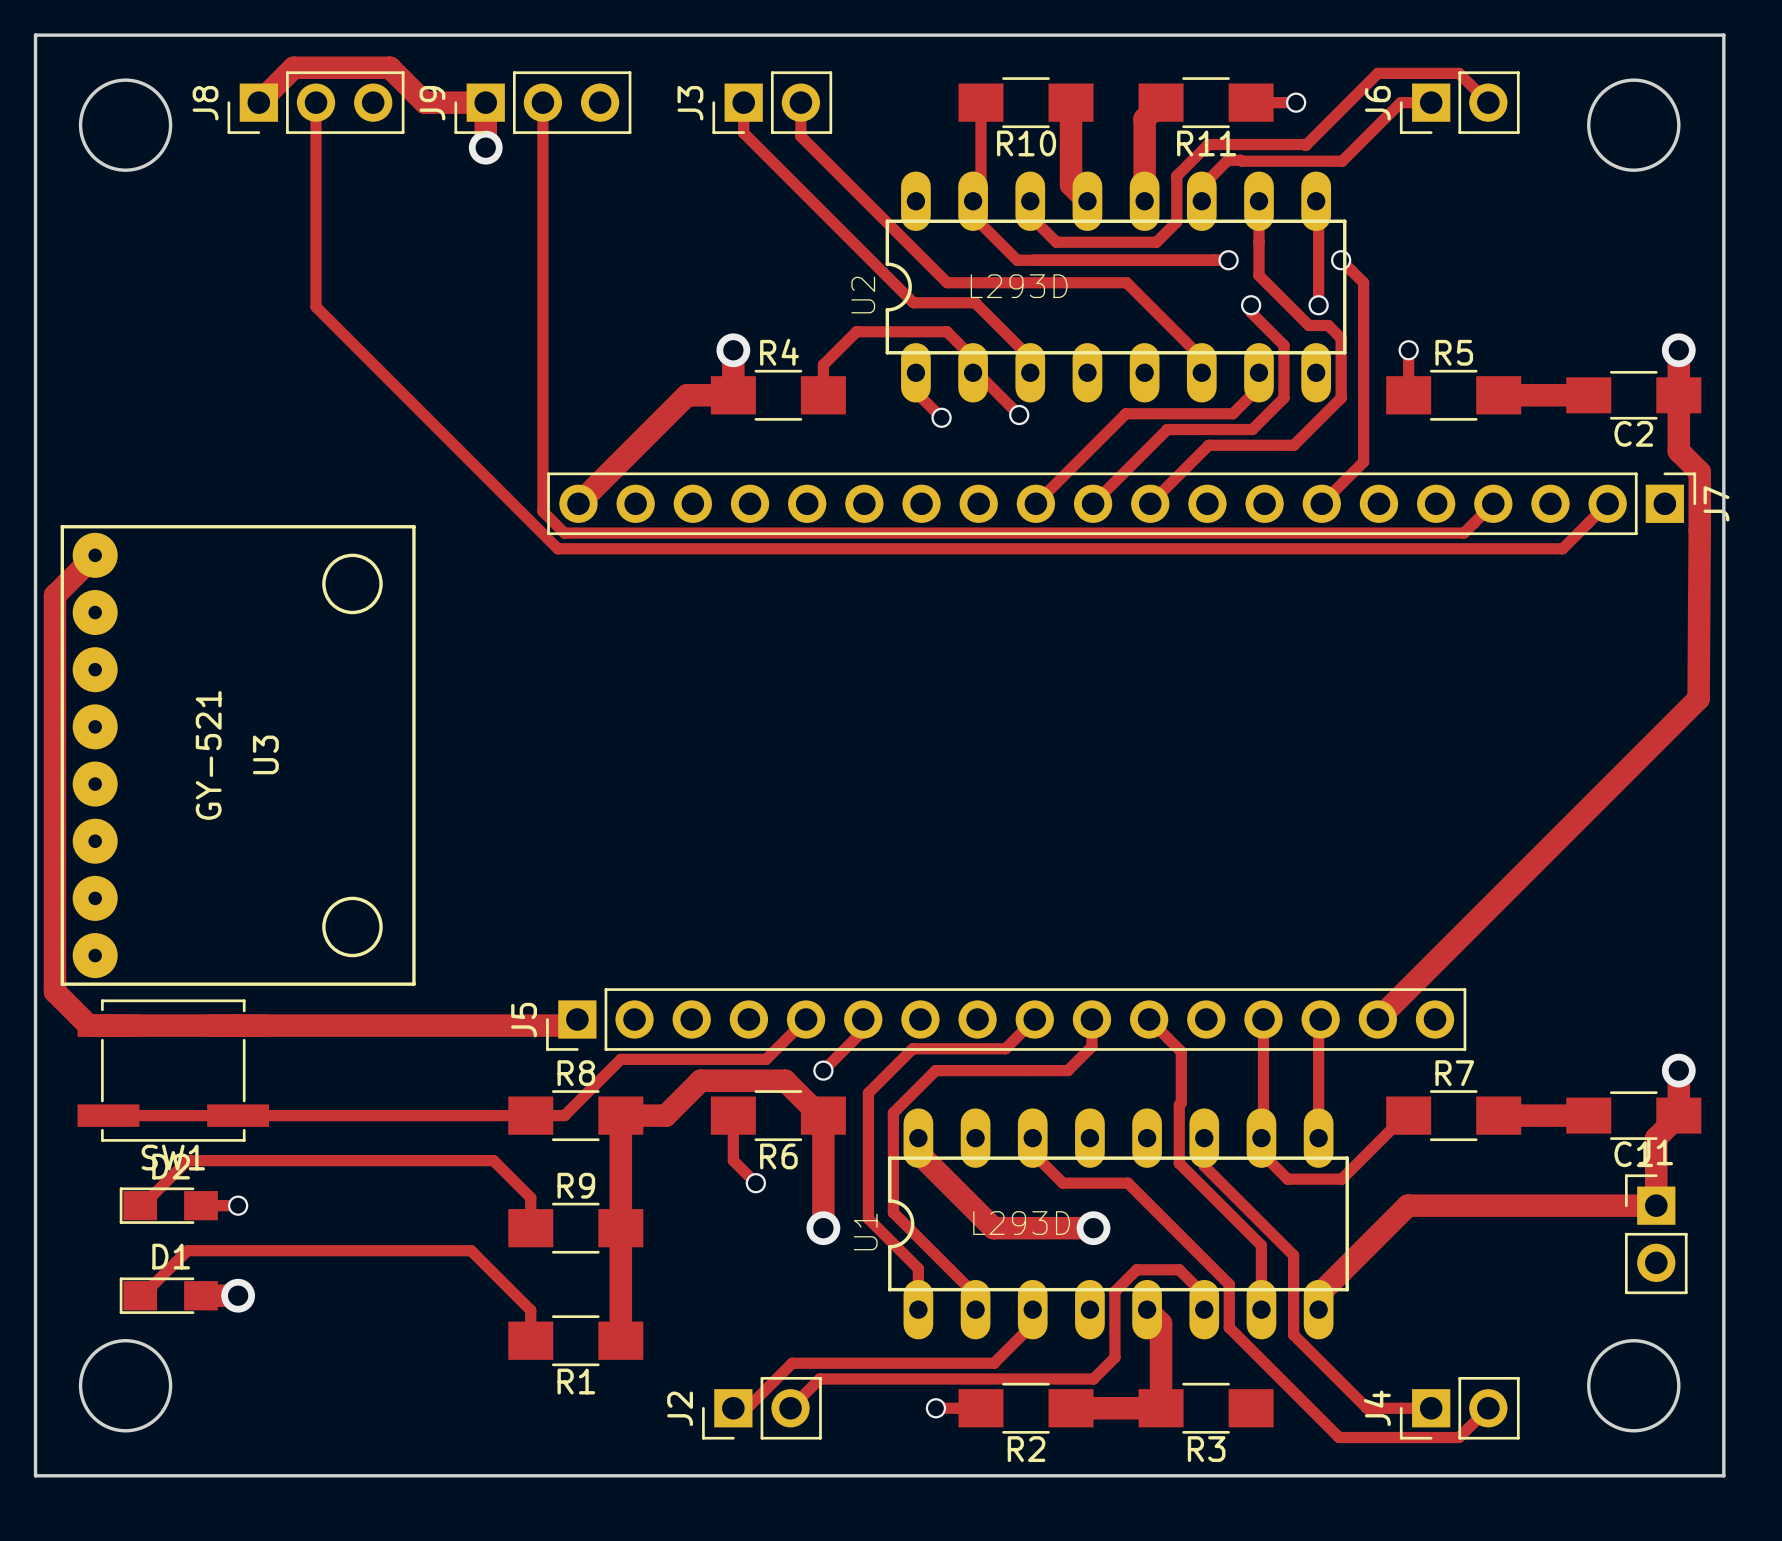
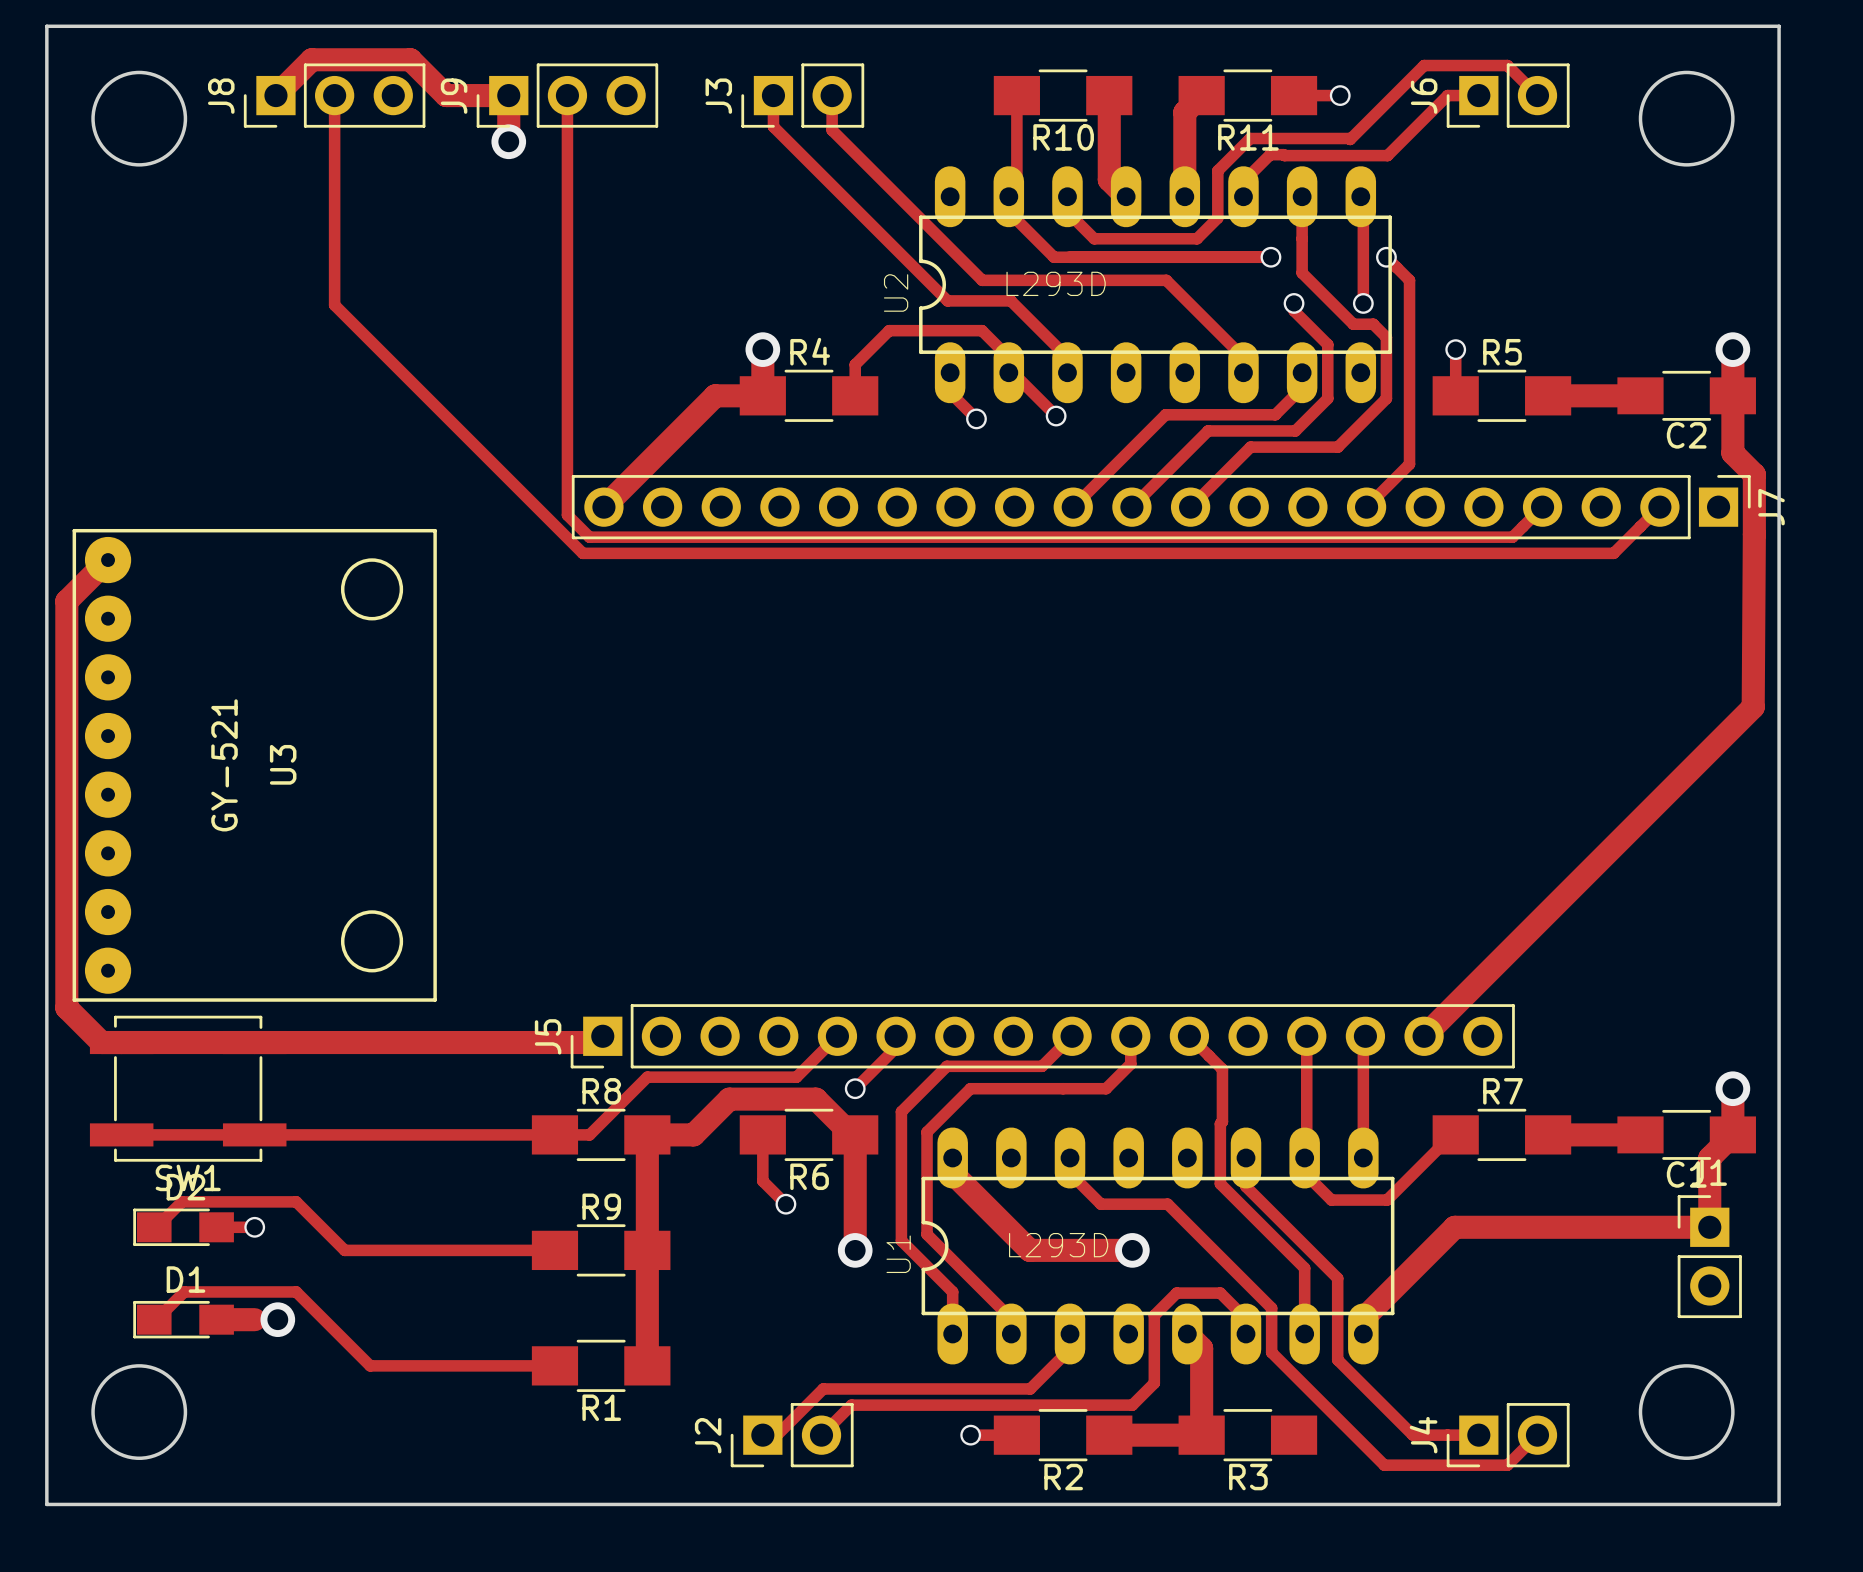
track: (167, 1180) (187, 1160) (493, 1160) (530, 1197) (530, 1228) -> (181, 1201) (296, 1201) (344, 1250) (554, 1250)
track: (169, 1268) (187, 1250) (471, 1250) (530, 1310) (530, 1340) -> (184, 1291) (296, 1291) (370, 1365) (554, 1365)
via position: (238, 1295) -> (277, 1319)

